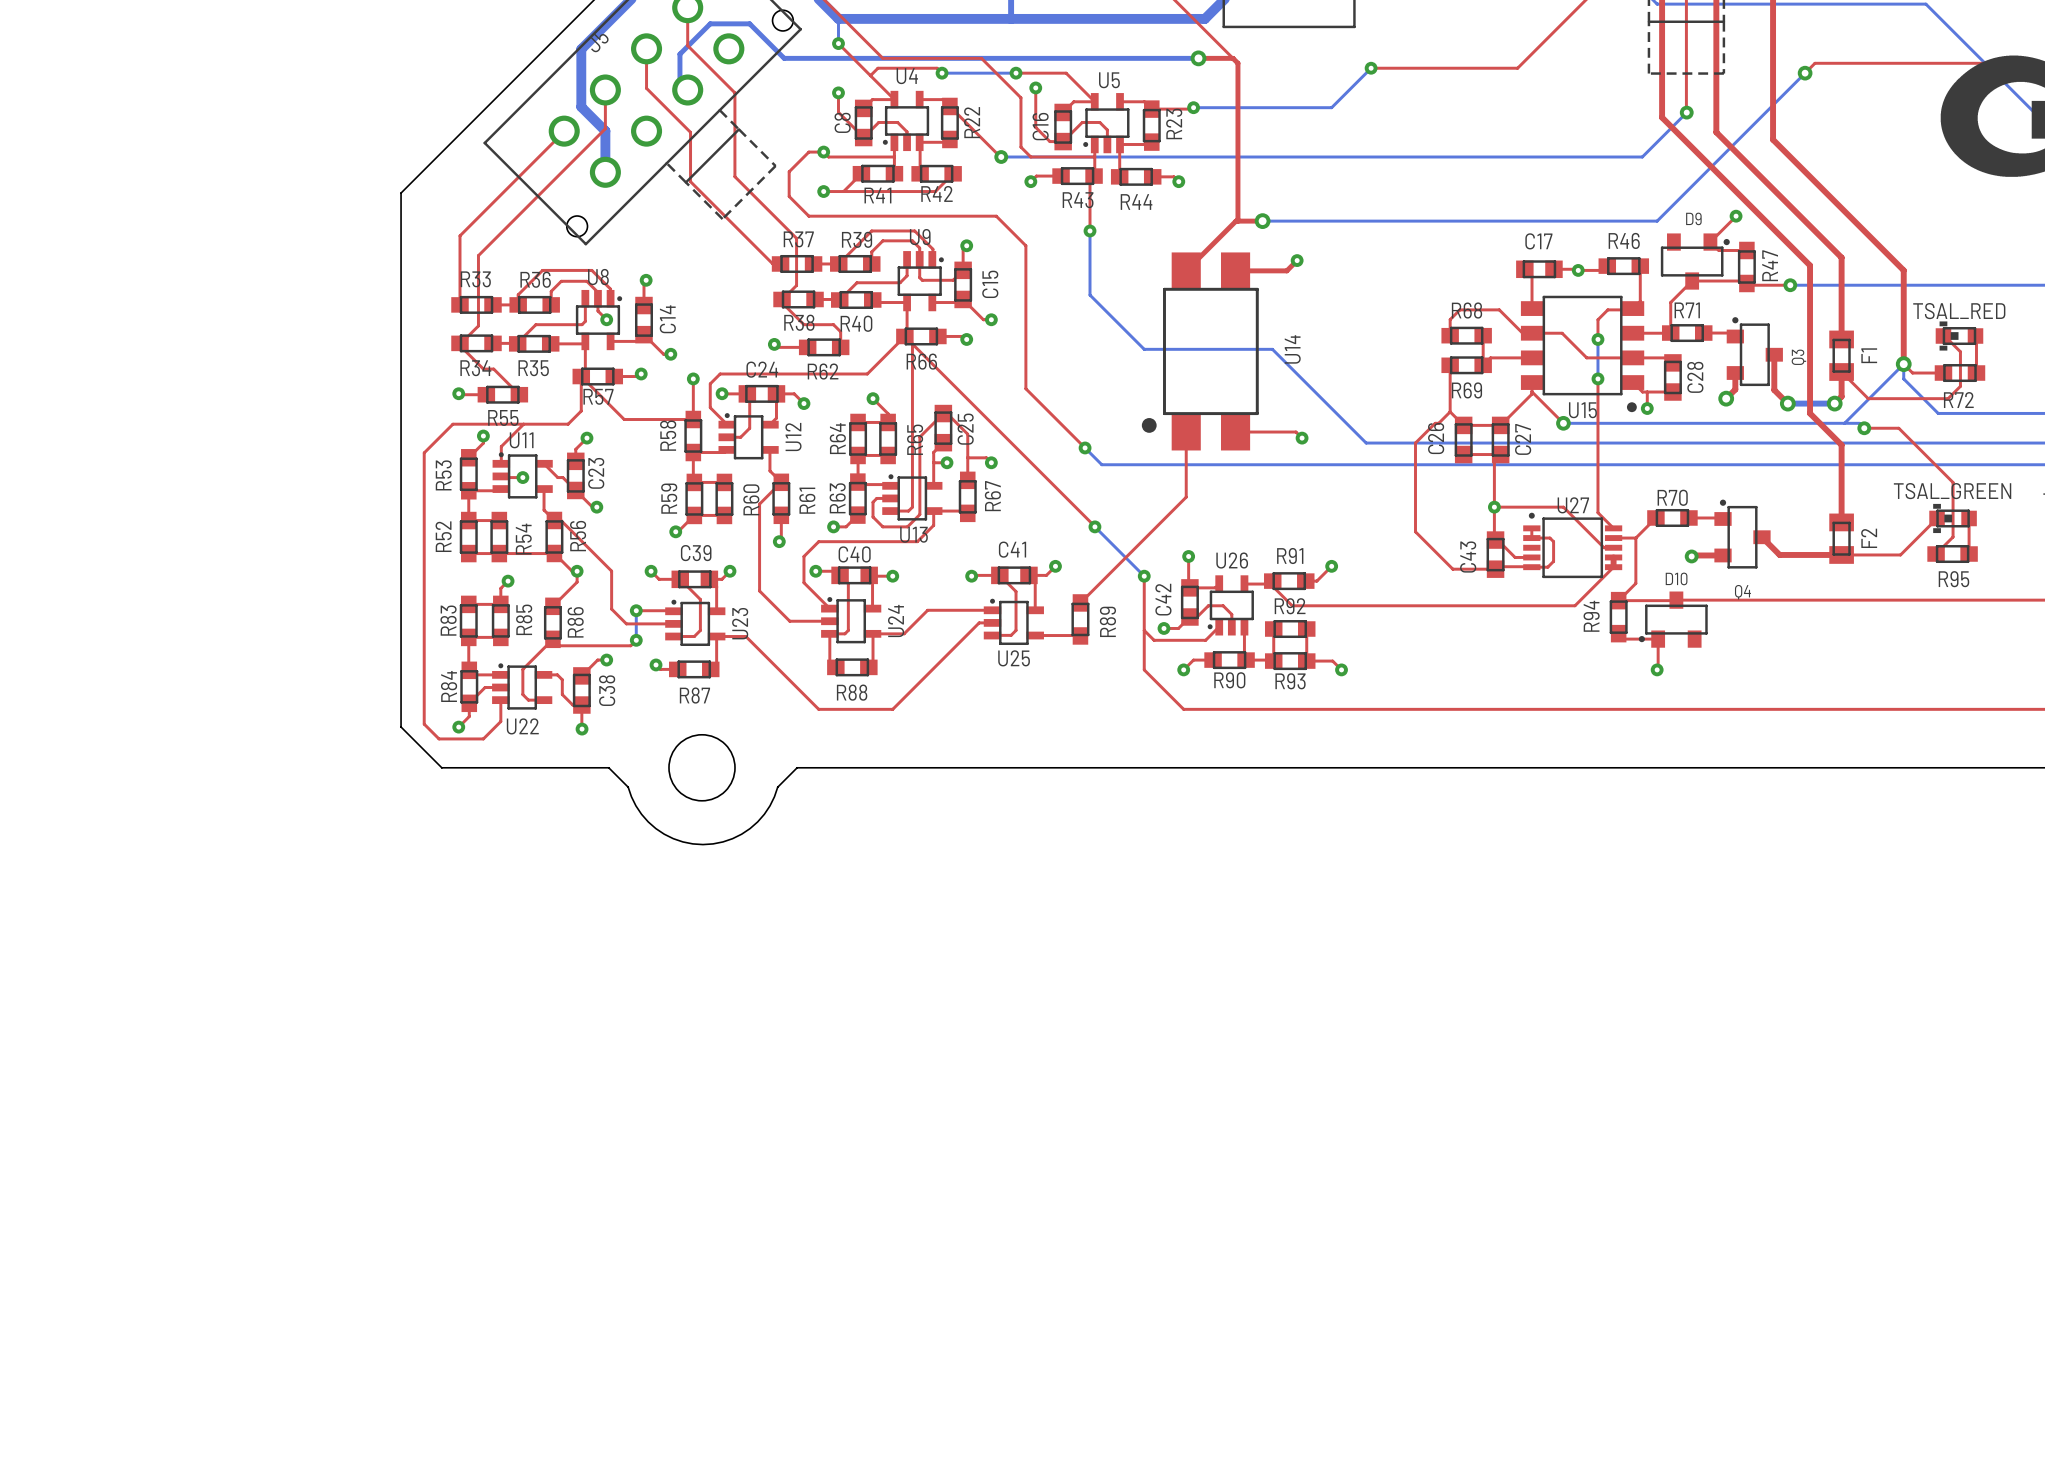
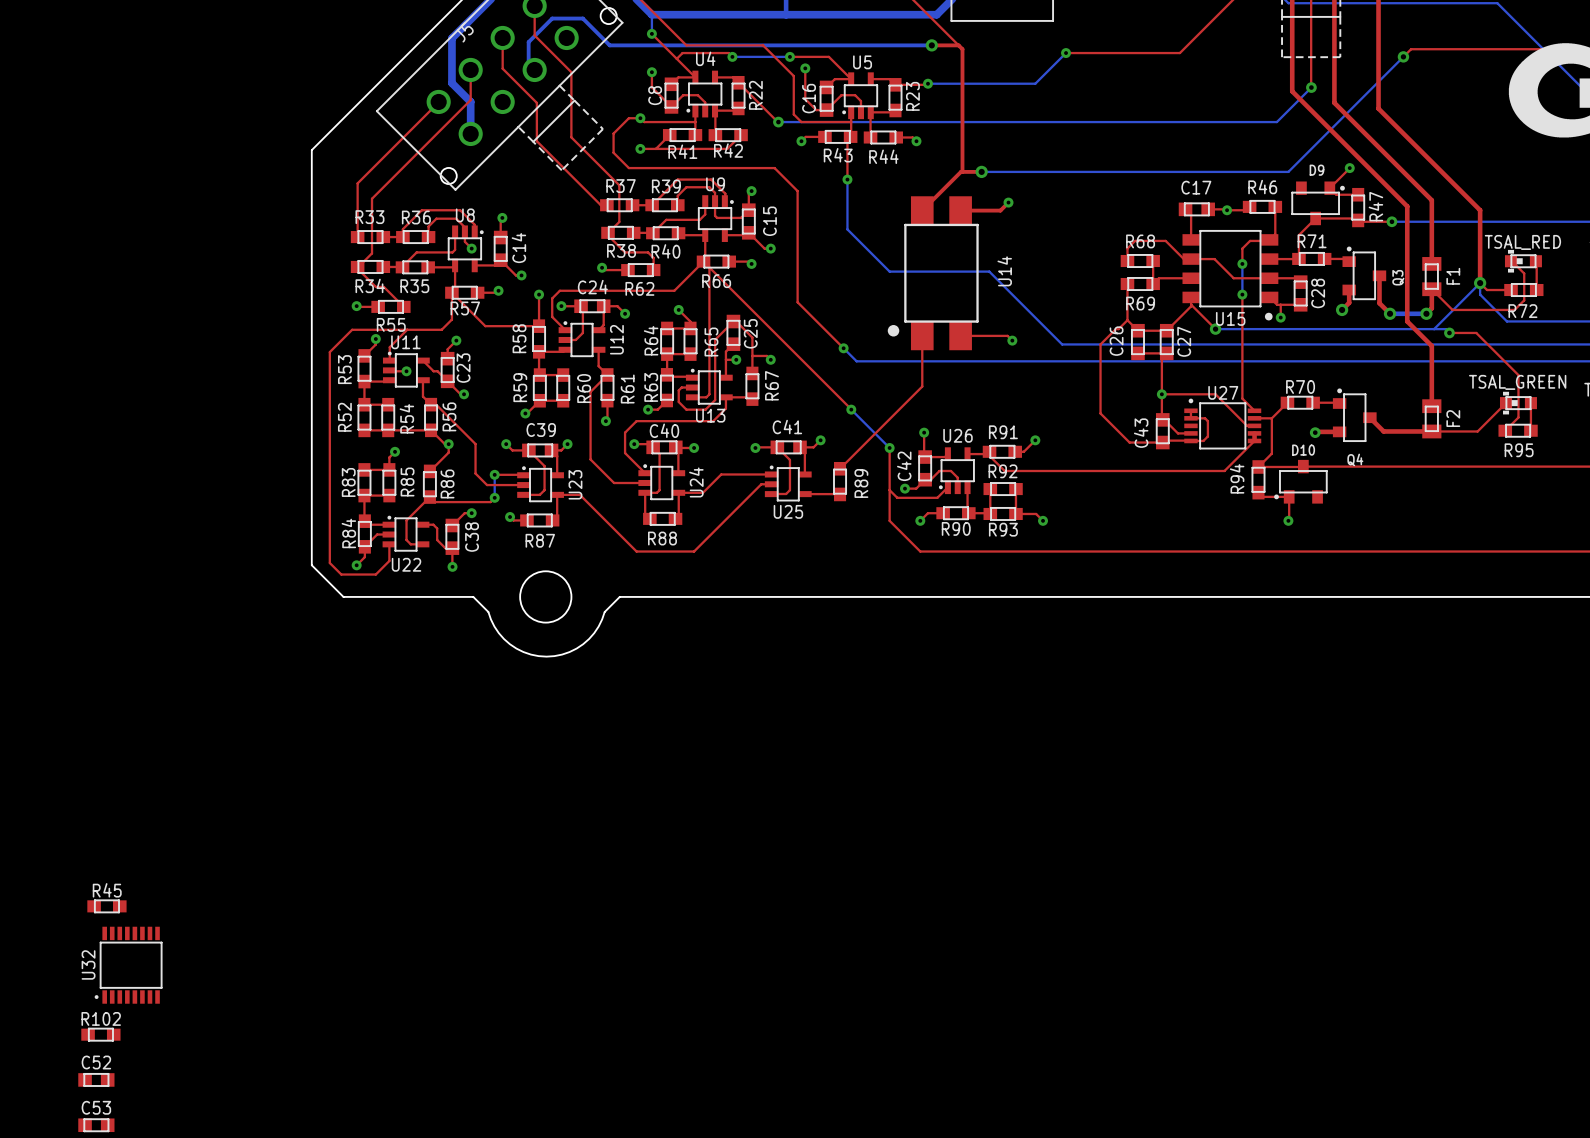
R45: none -> (106, 906)
U32: none -> (128, 965)
R102: none -> (100, 1034)
C52: none -> (96, 1079)
C53: none -> (96, 1125)

